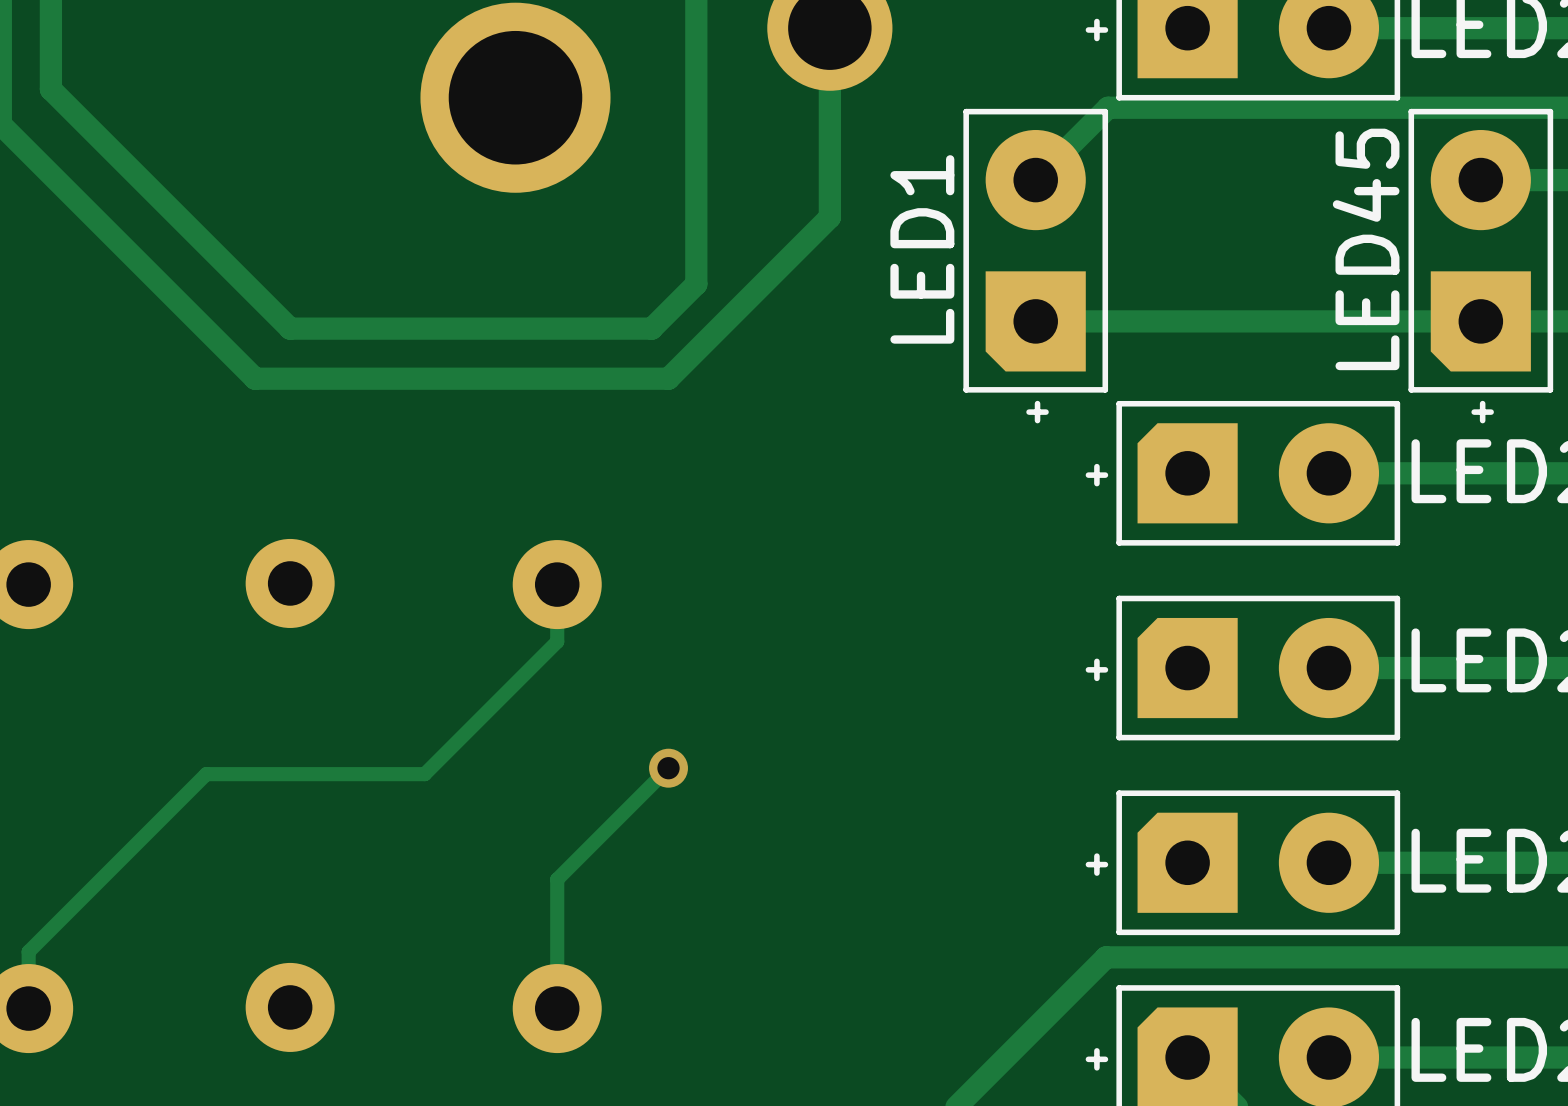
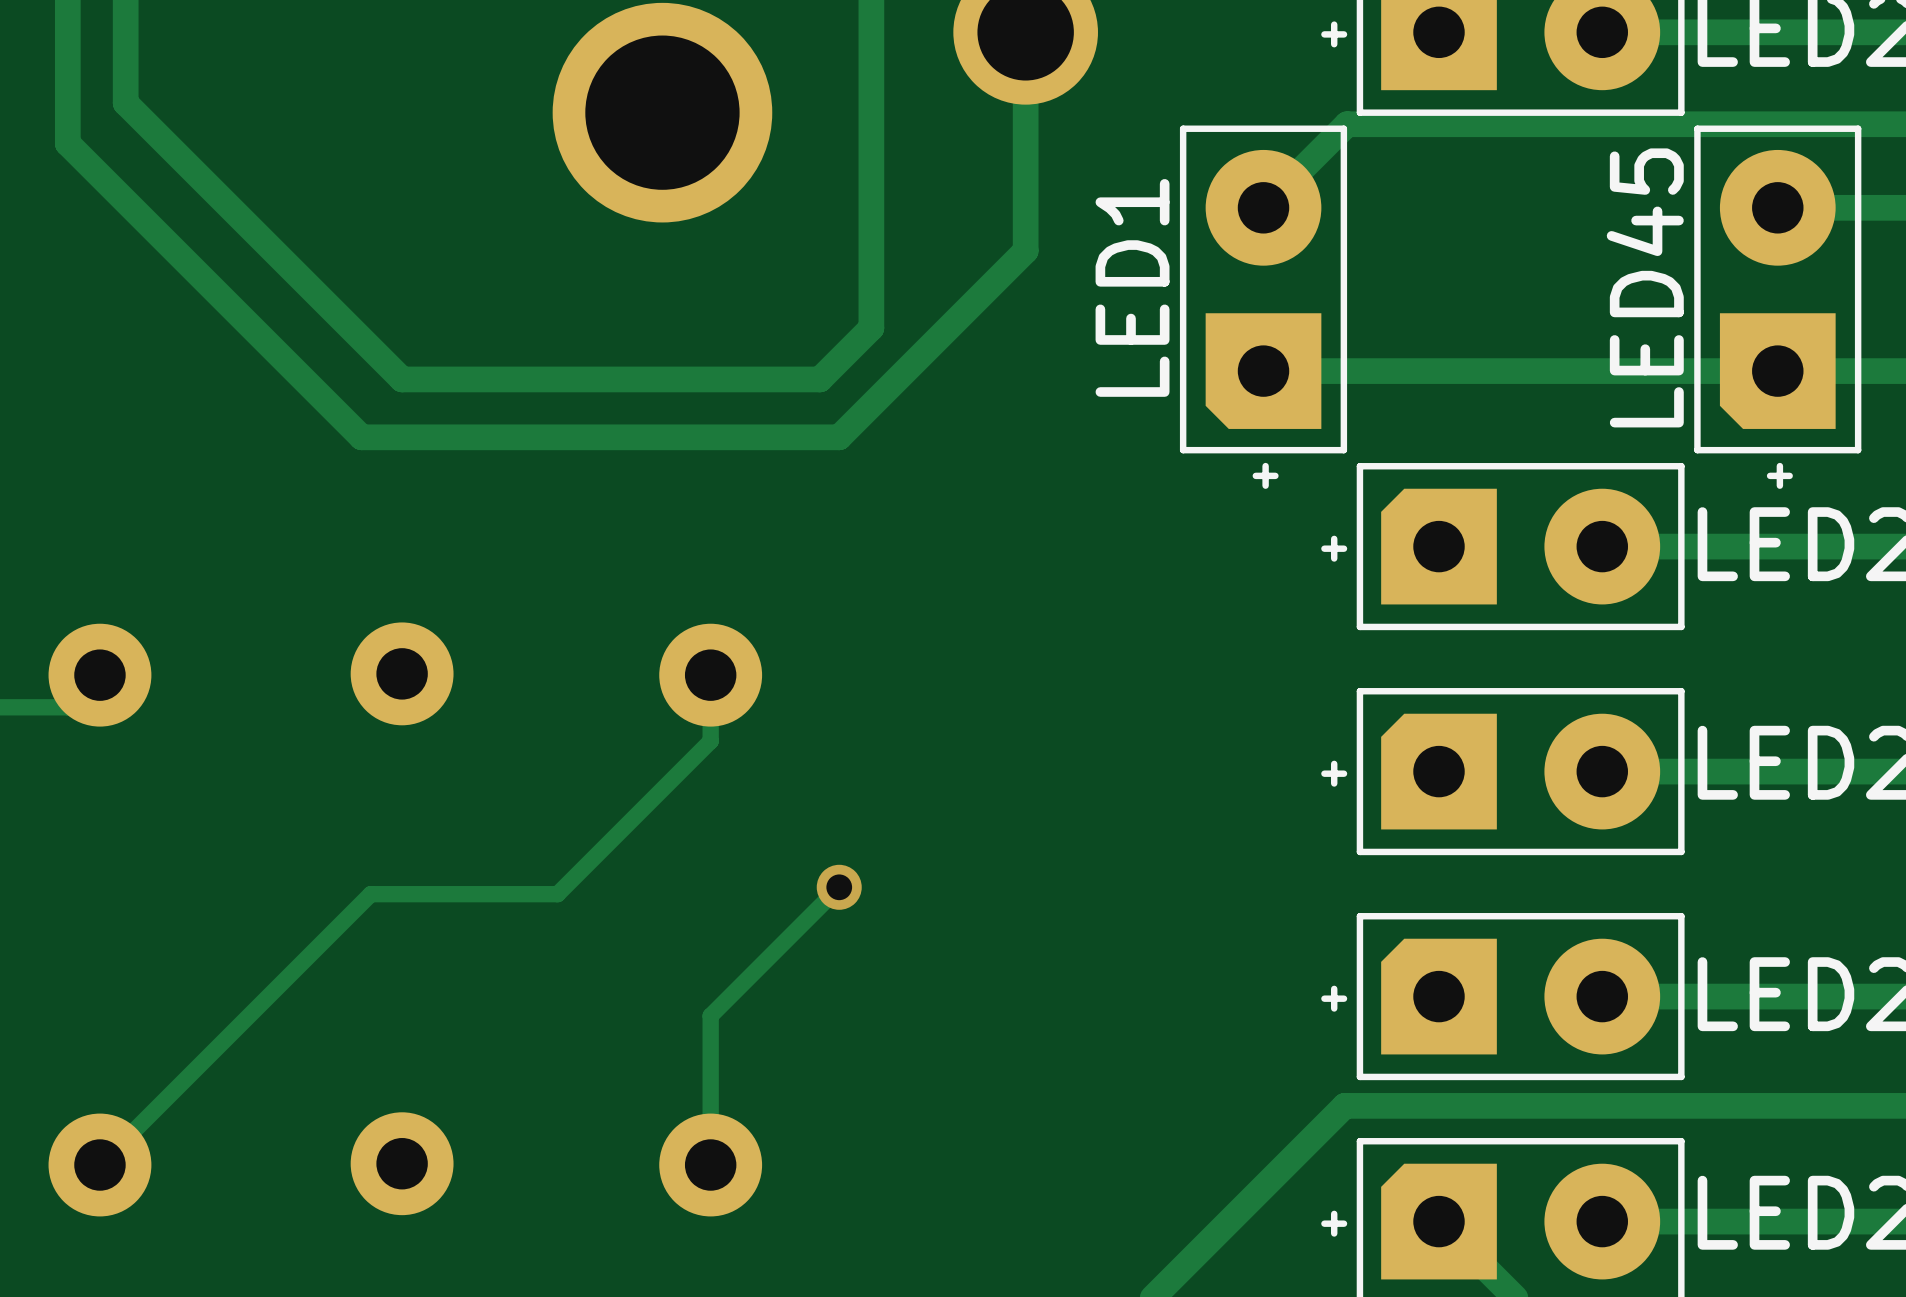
track: (263, 774) (206, 774) (28, 951) (28, 1008) -> (370, 894) (99, 1165)

